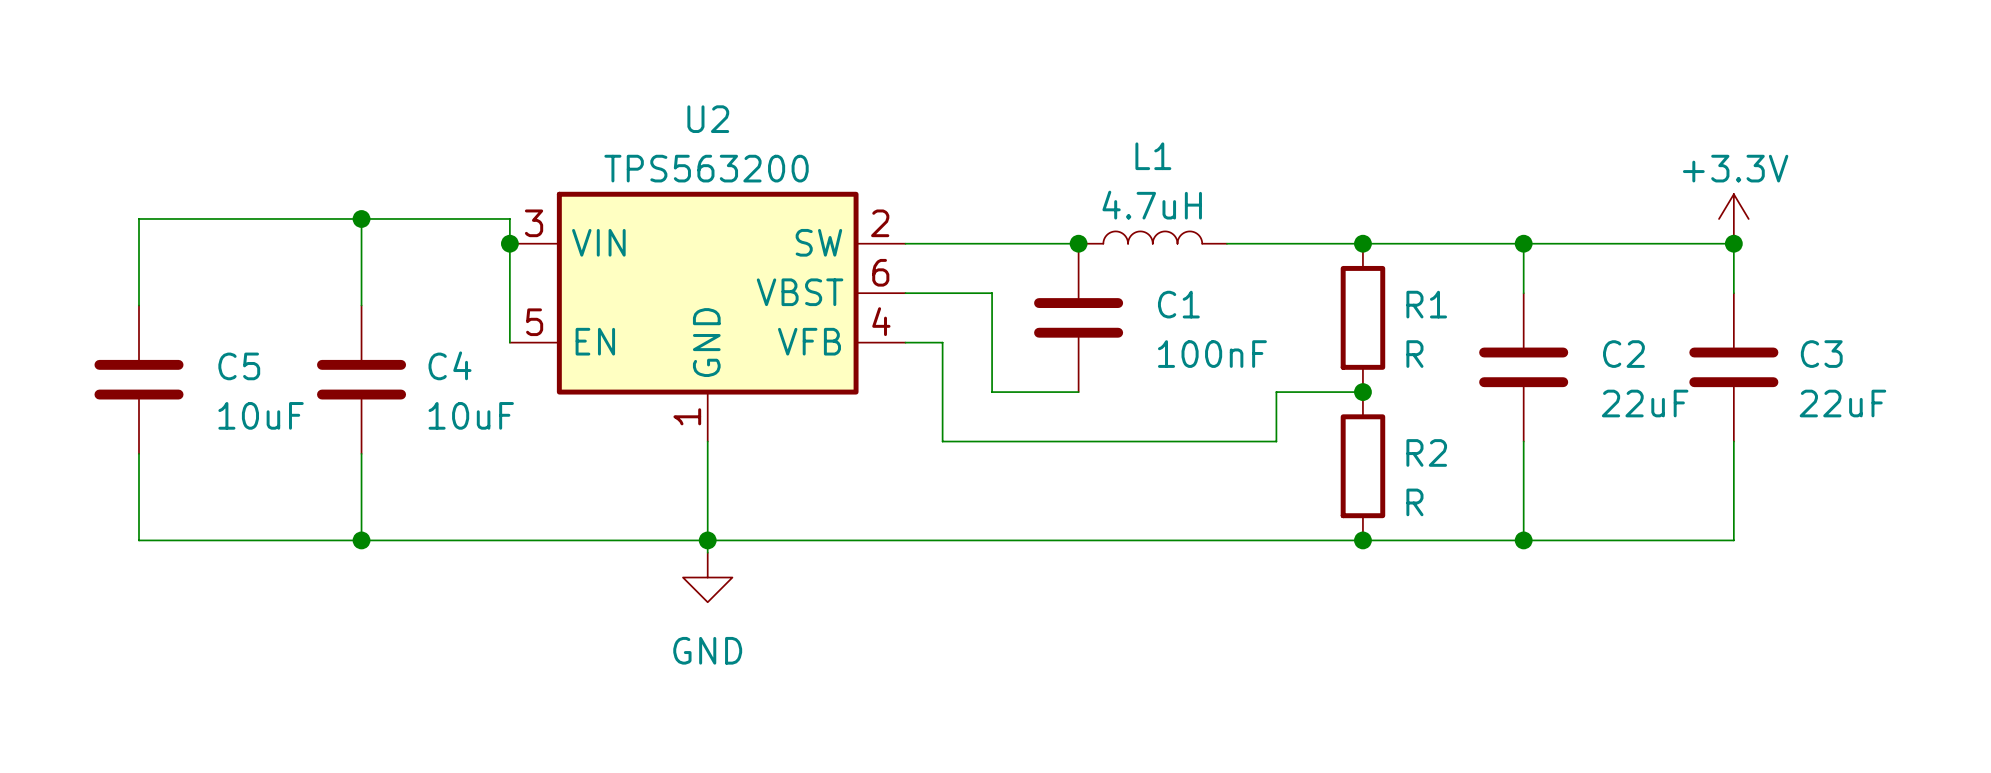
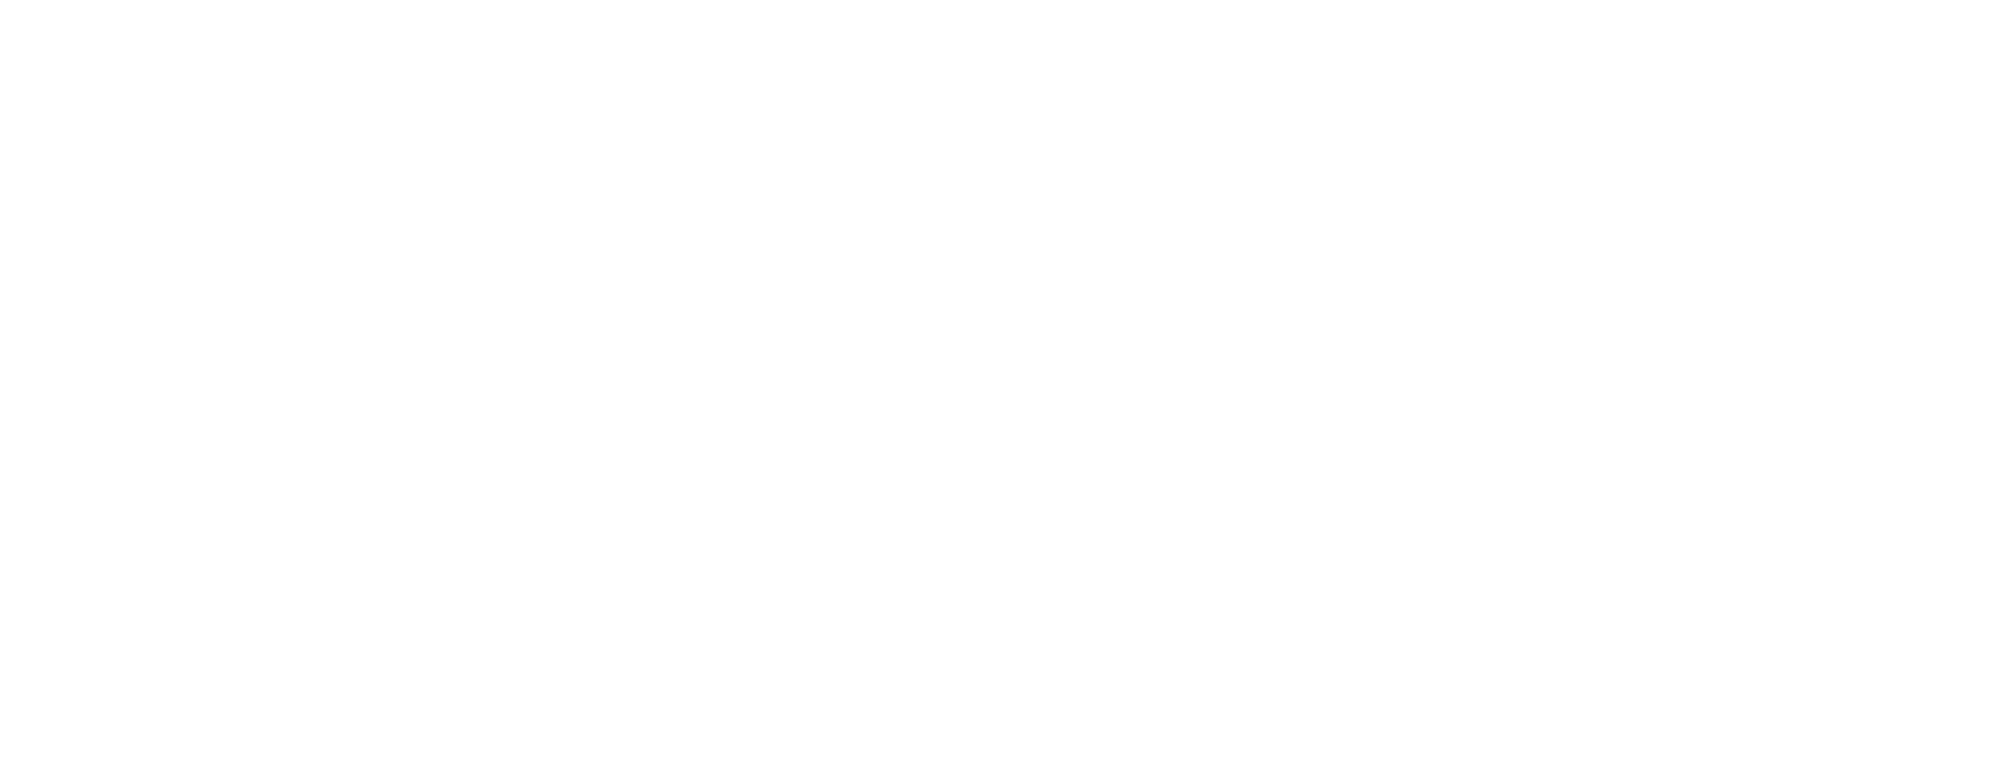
wire: (361, 218) (361, 305) -> none
junction: (361, 218) -> none
power symbol: +3.3V (1733, 218) -> none
L1: 4.7uH (1152, 237) -> none
junction: (509, 243) -> none
wire: (905, 243) (1078, 243) -> none
junction: (1078, 243) -> none
wire: (1226, 243) (1733, 243) (1733, 293) -> none
junction: (1362, 243) -> none
wire: (1523, 243) (1523, 293) -> none
junction: (1523, 243) -> none
junction: (1733, 243) -> none
wire: (905, 293) (992, 293) (992, 392) (1078, 392) -> none
wire: (138, 305) (138, 218) (509, 218) (509, 342) -> none
U2: TPS563200 (707, 316) -> none
C1: 100nF (1078, 317) -> none
R1: R (1362, 317) -> none
wire: (905, 342) (942, 342) (942, 441) (1276, 441) (1276, 392) (1362, 392) -> none
C2: 22uF (1523, 367) -> none
C3: 22uF (1733, 367) -> none
C5: 10uF (138, 379) -> none
C4: 10uF (361, 379) -> none
junction: (1362, 392) -> none
wire: (707, 441) (707, 552) -> none
wire: (1523, 441) (1523, 540) -> none
wire: (1733, 441) (1733, 540) (138, 540) (138, 453) -> none
wire: (361, 453) (361, 540) -> none
R2: R (1362, 466) -> none
junction: (361, 540) -> none
junction: (707, 540) -> none
junction: (1362, 540) -> none
junction: (1523, 540) -> none
power symbol: GND (707, 577) -> none

